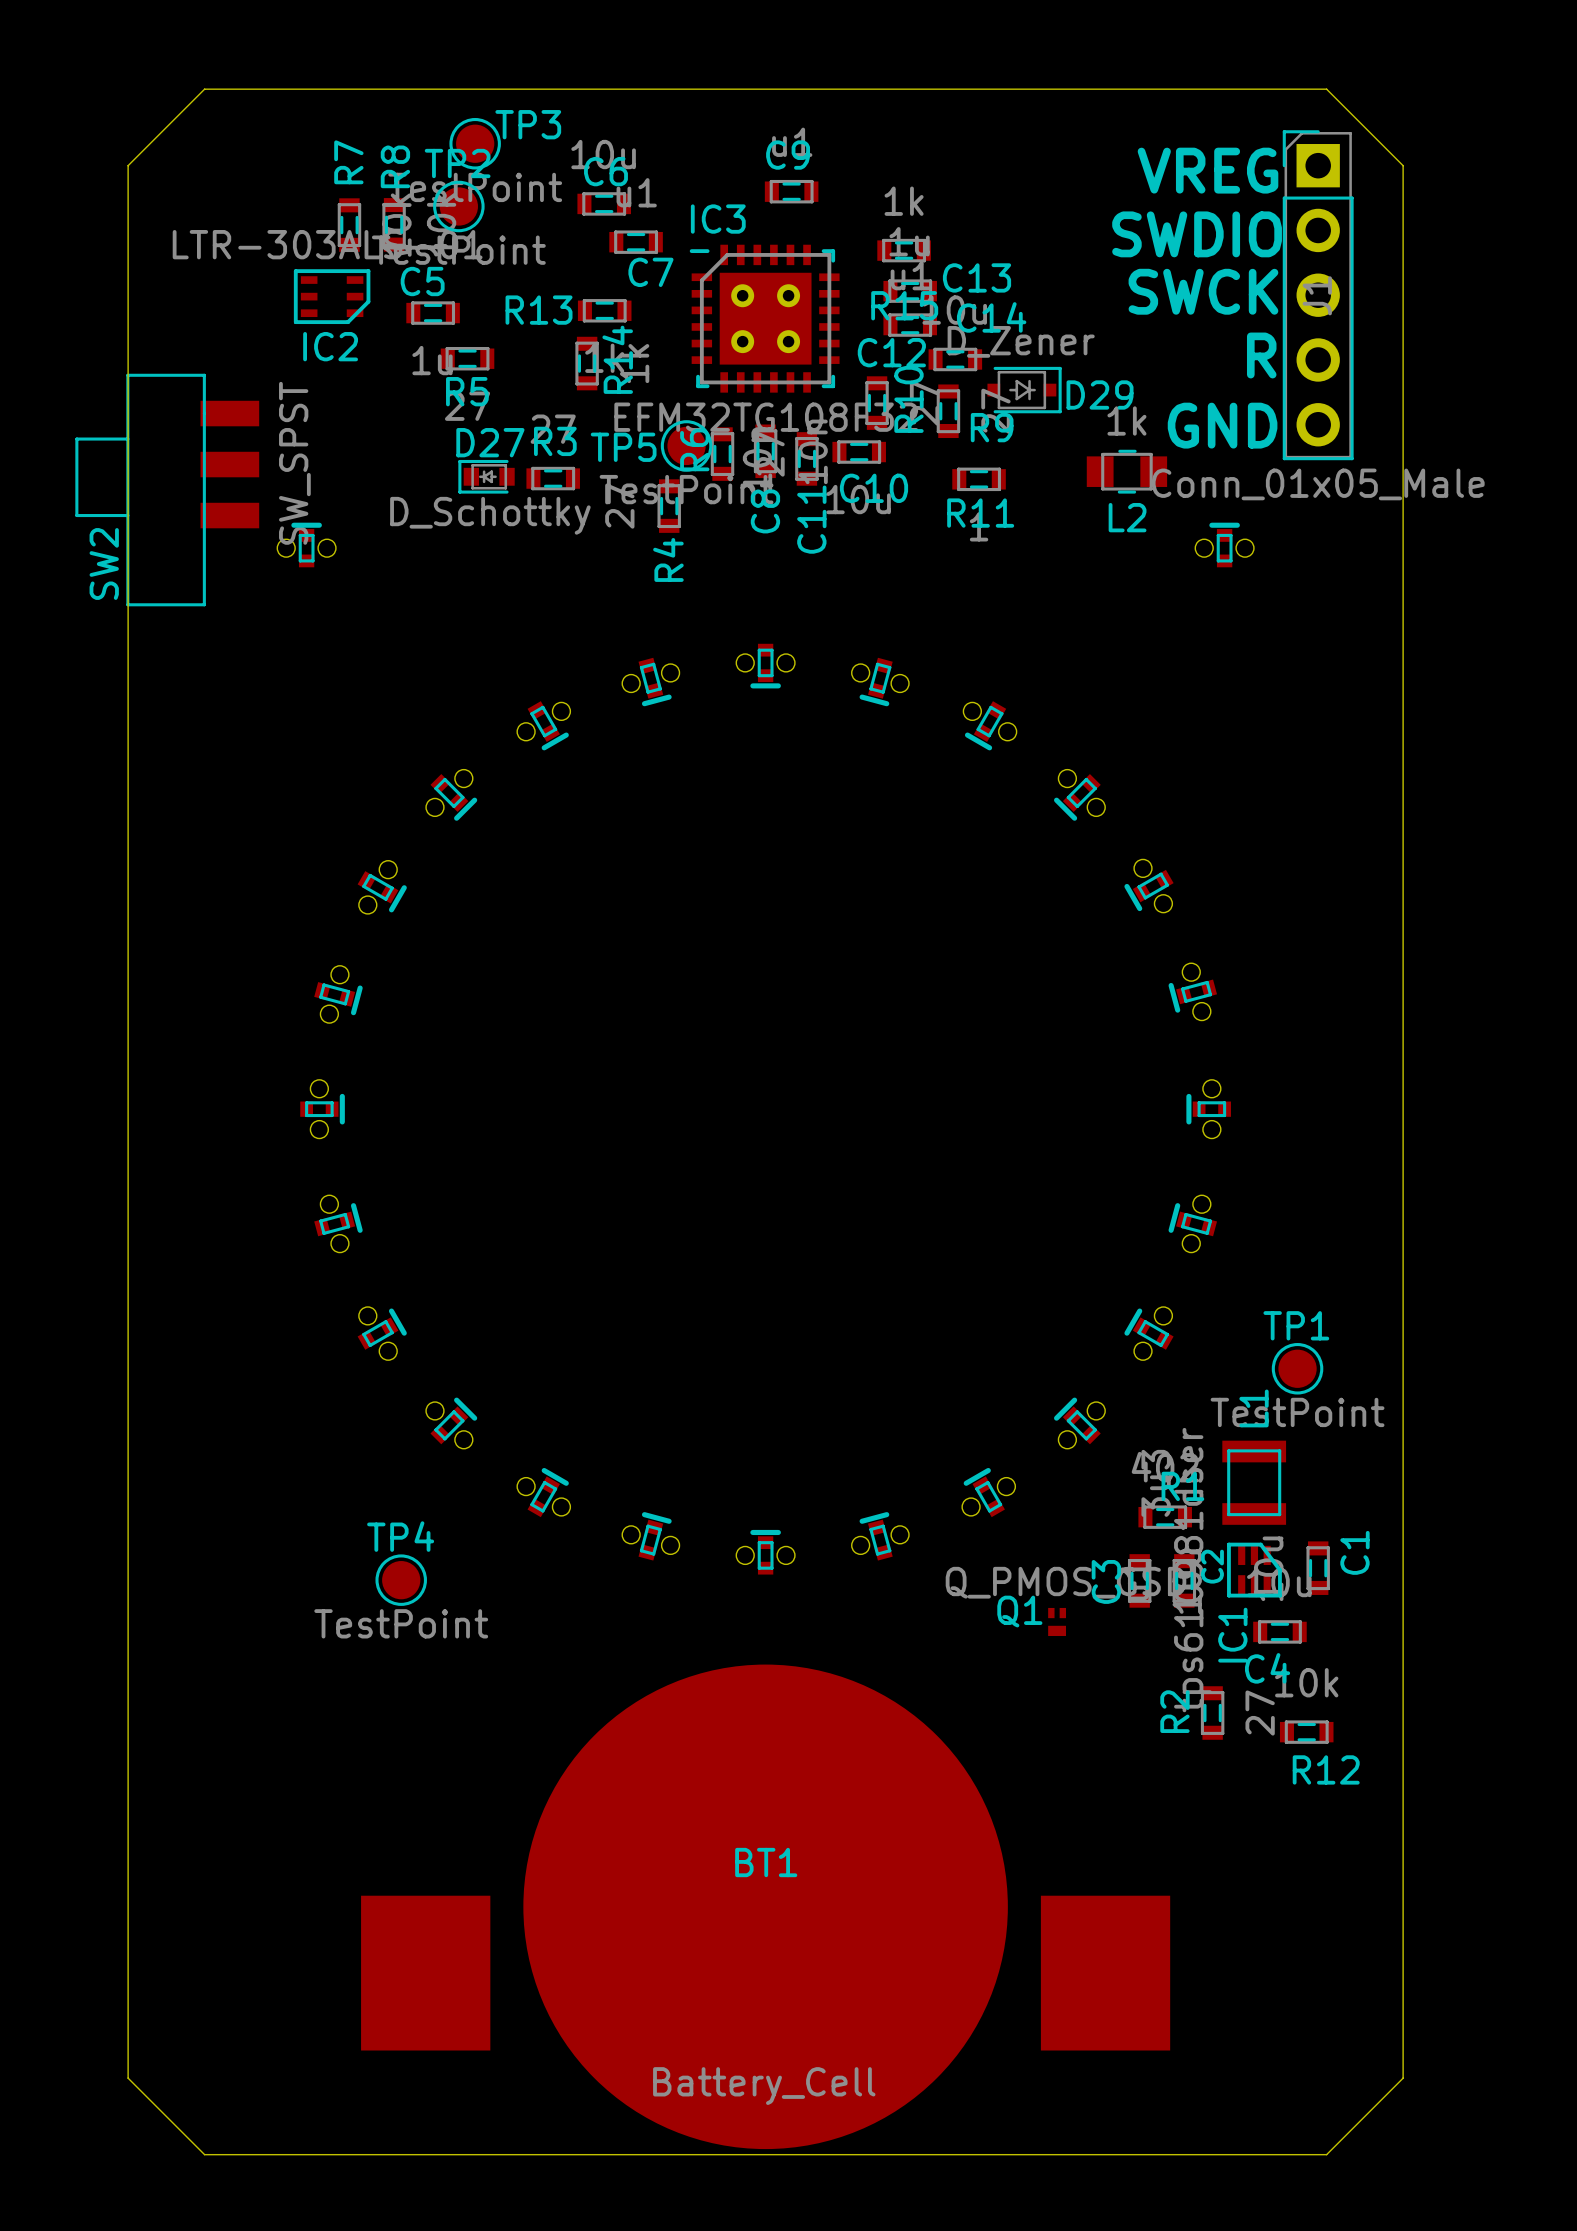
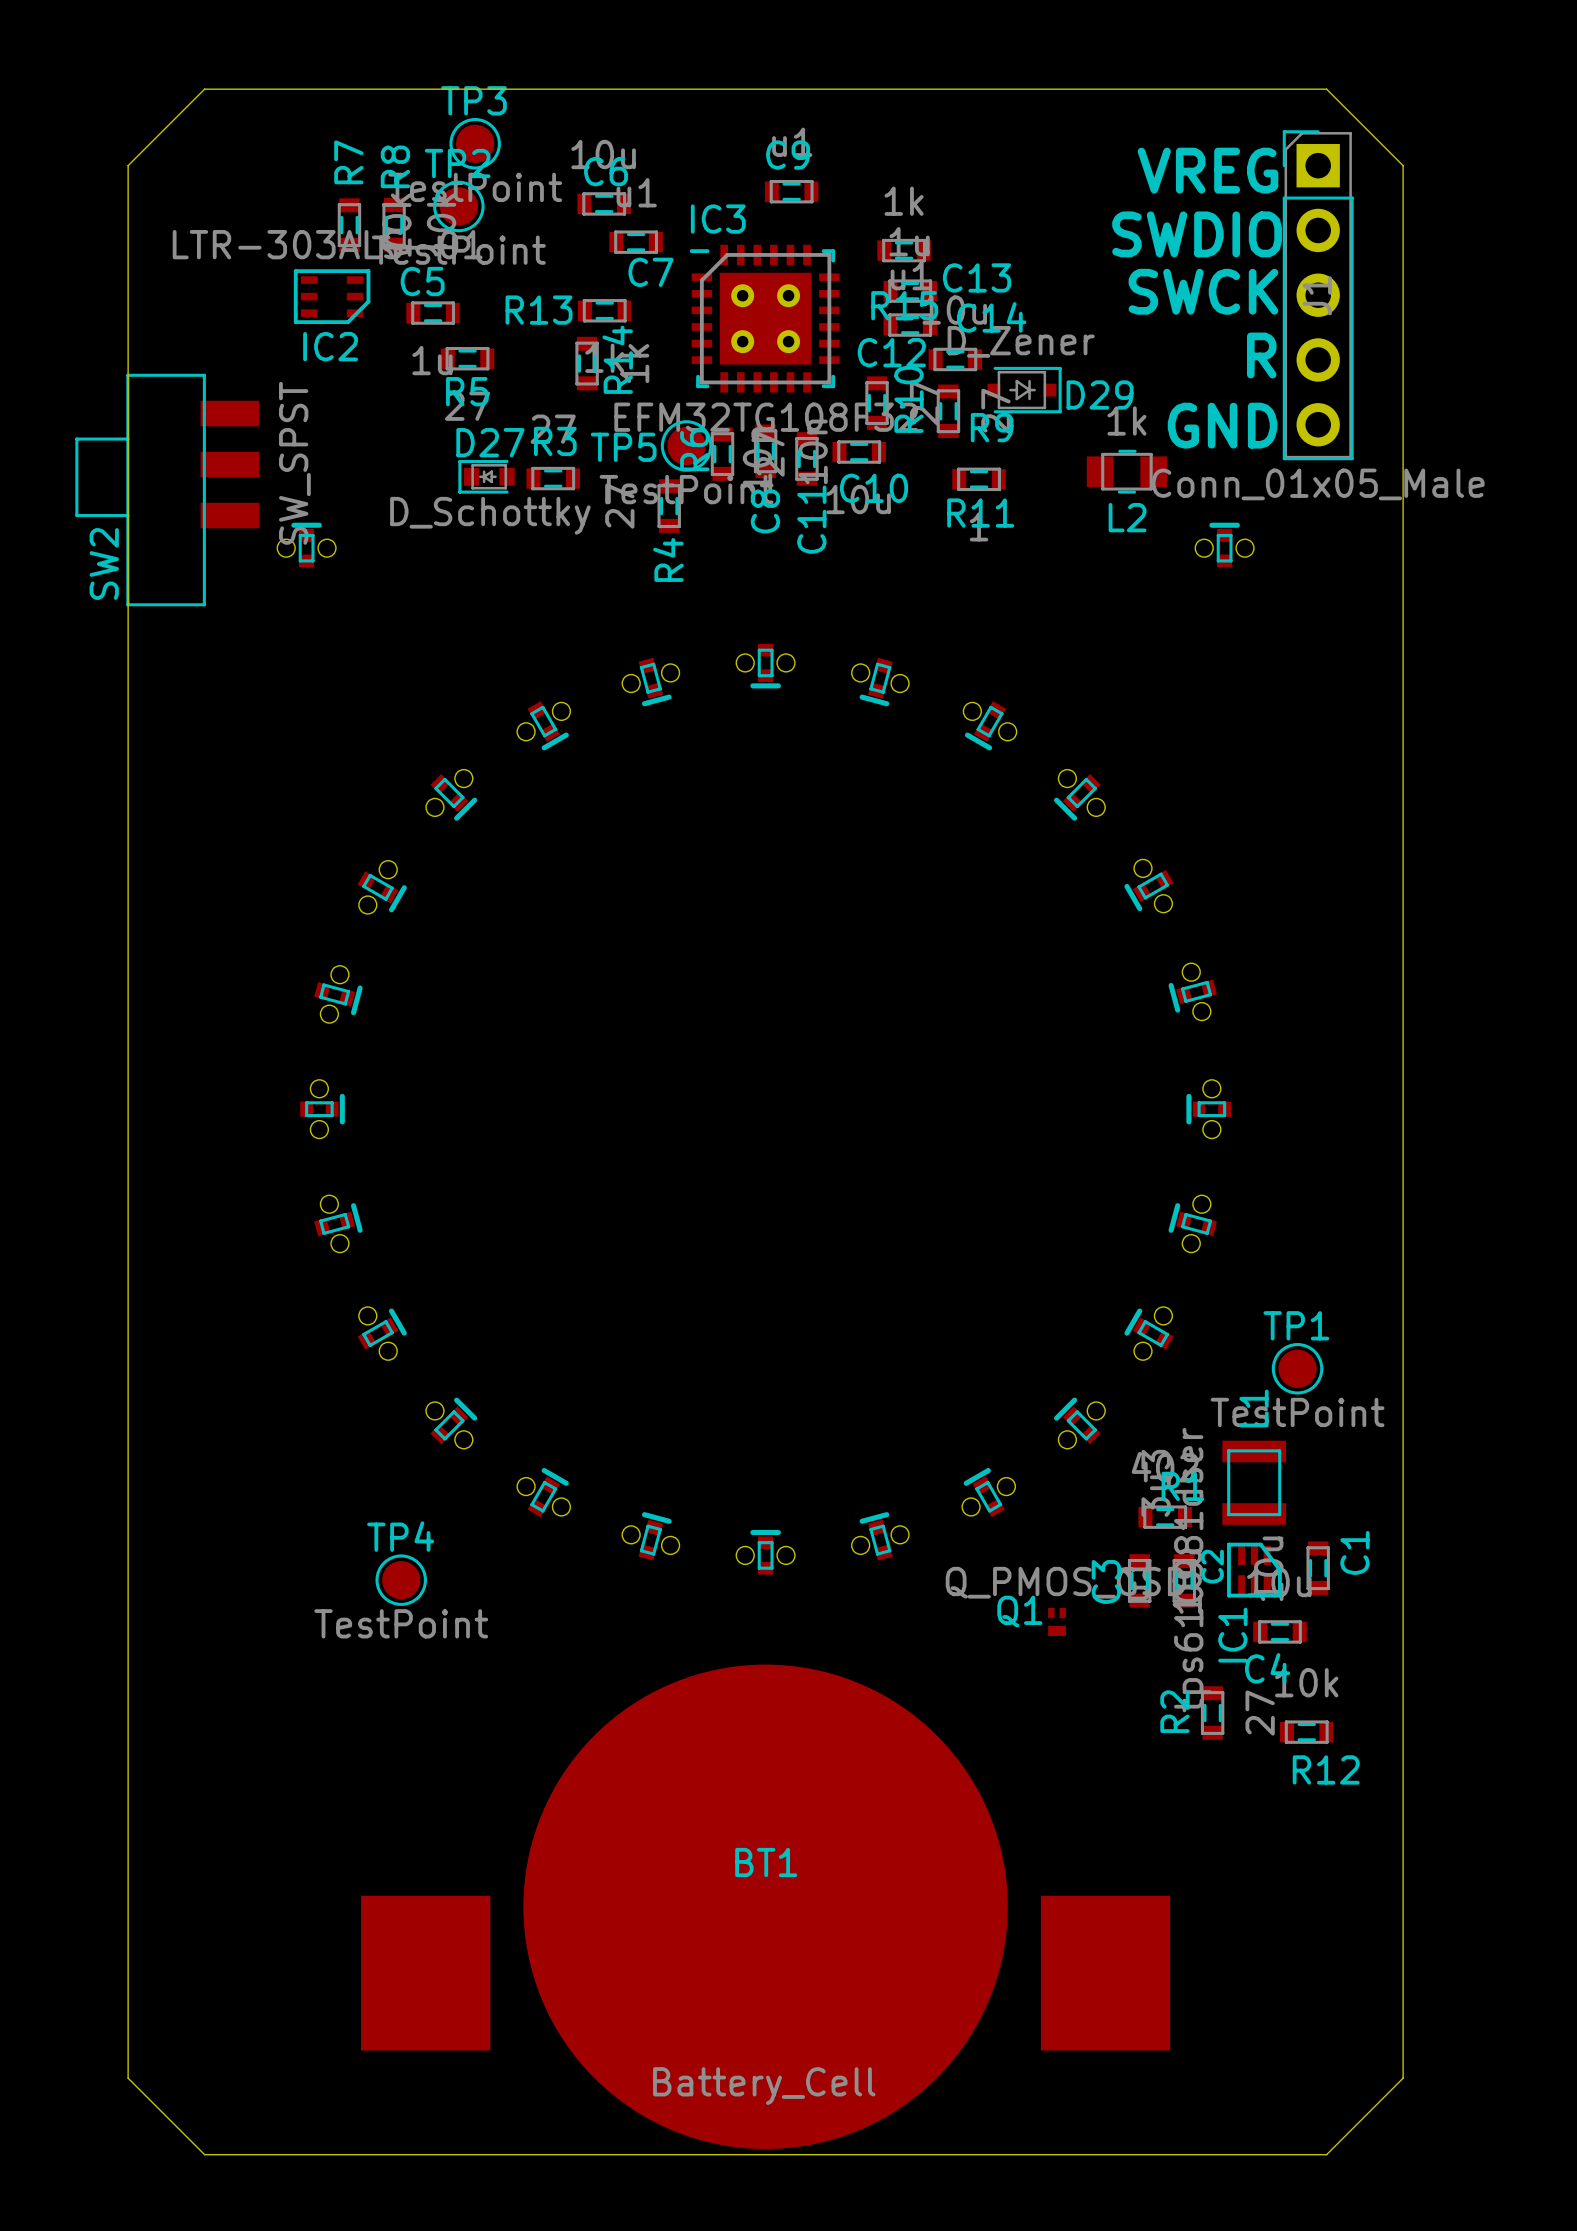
TP3 name position: TP3 (528, 124) -> TP3 (473, 100)

